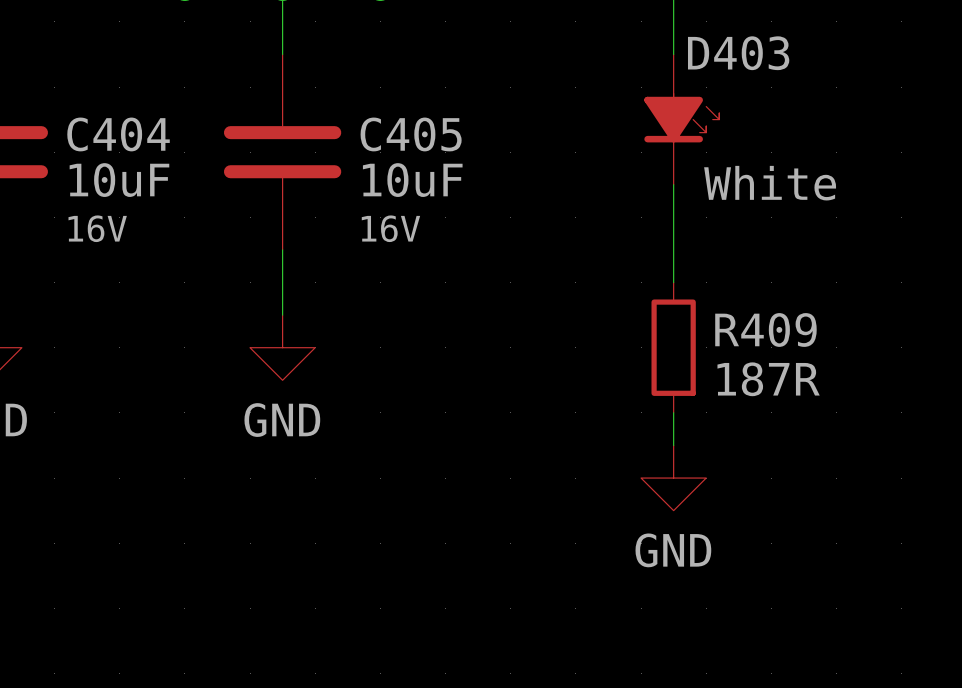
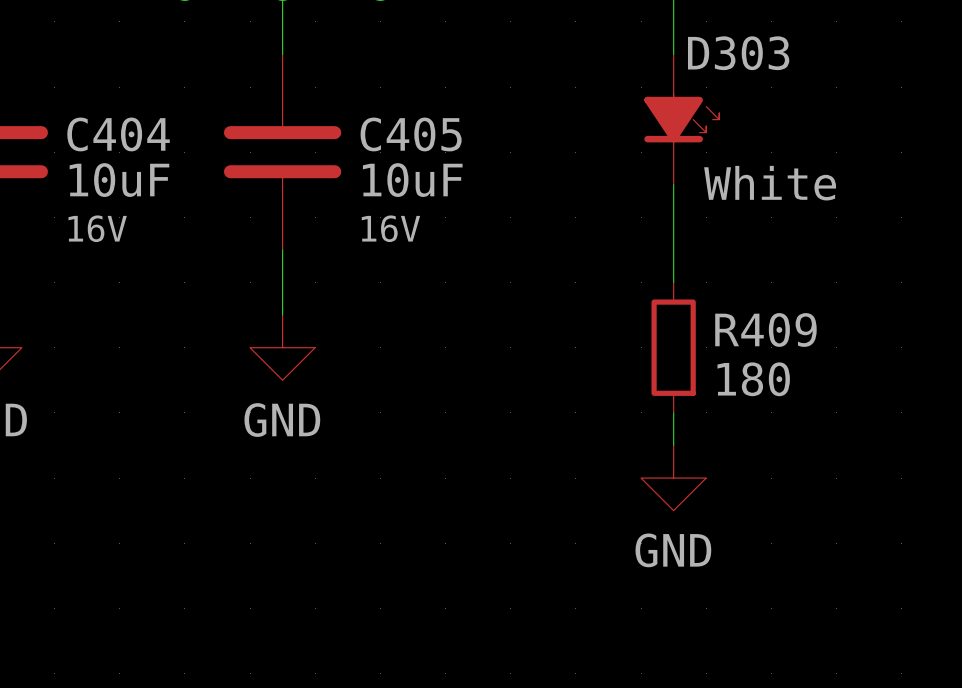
D403 name: D403 (738, 53) -> D303 (738, 53)
R409 value: 187R (768, 379) -> 180 (753, 379)

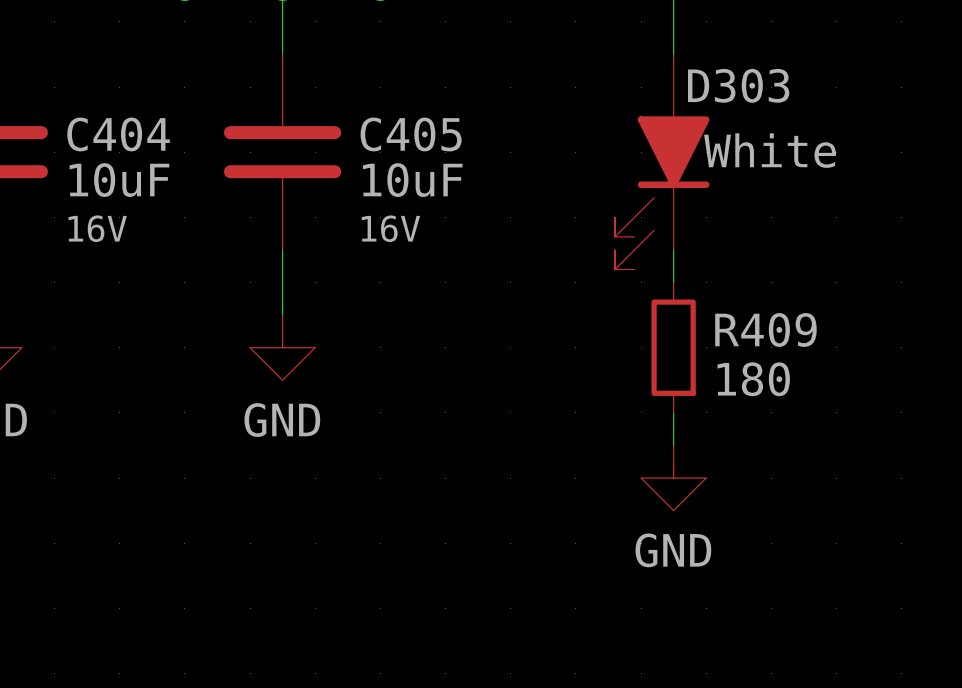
D303 symbol: [644, 54, 720, 185] -> [614, 54, 710, 270]
D303 value position: White (770, 183) -> White (770, 150)

